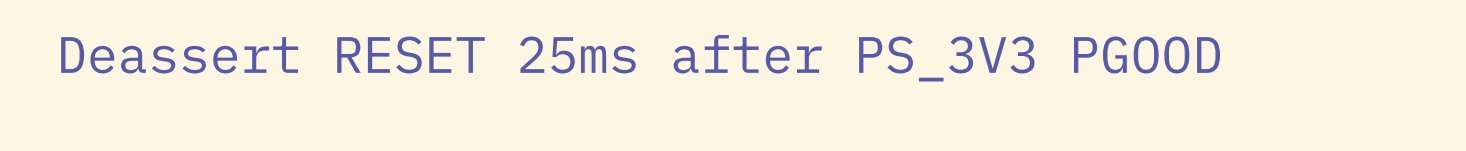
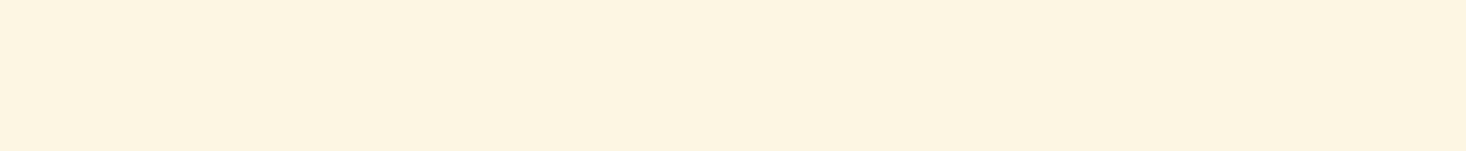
text: Deassert RESET 25ms after PS_3V3 PGOOD (640, 58) -> none

